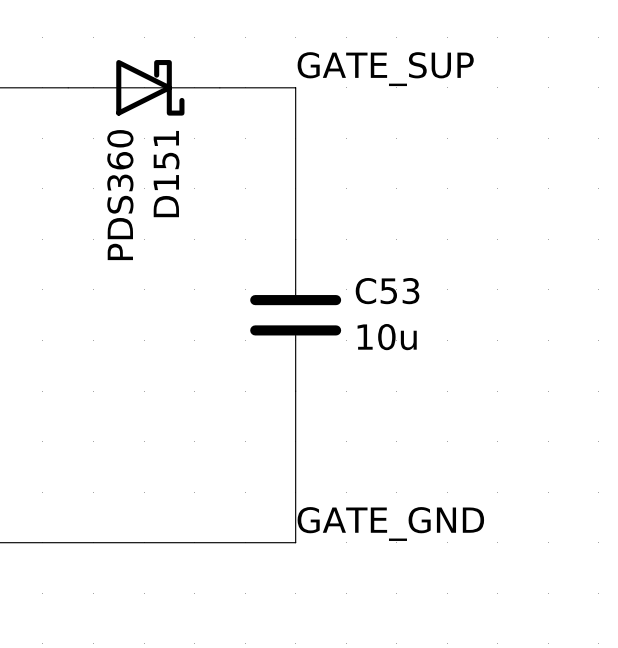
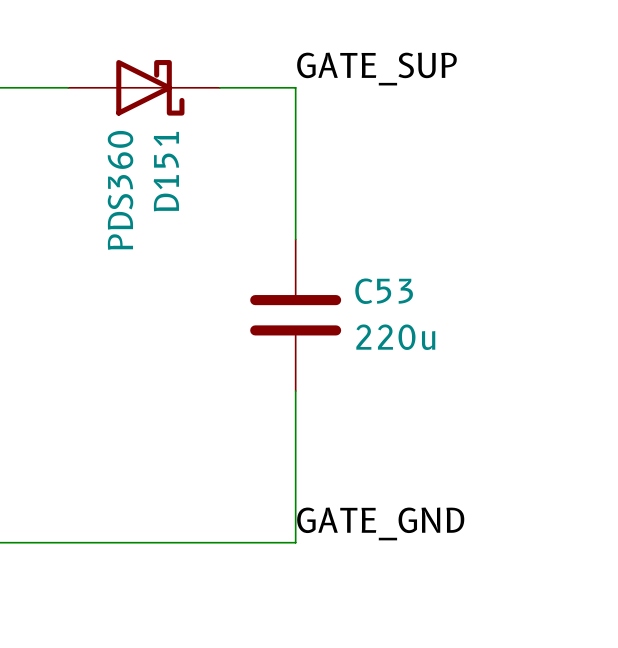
C53 value: 10u (387, 337) -> 220u (395, 337)

